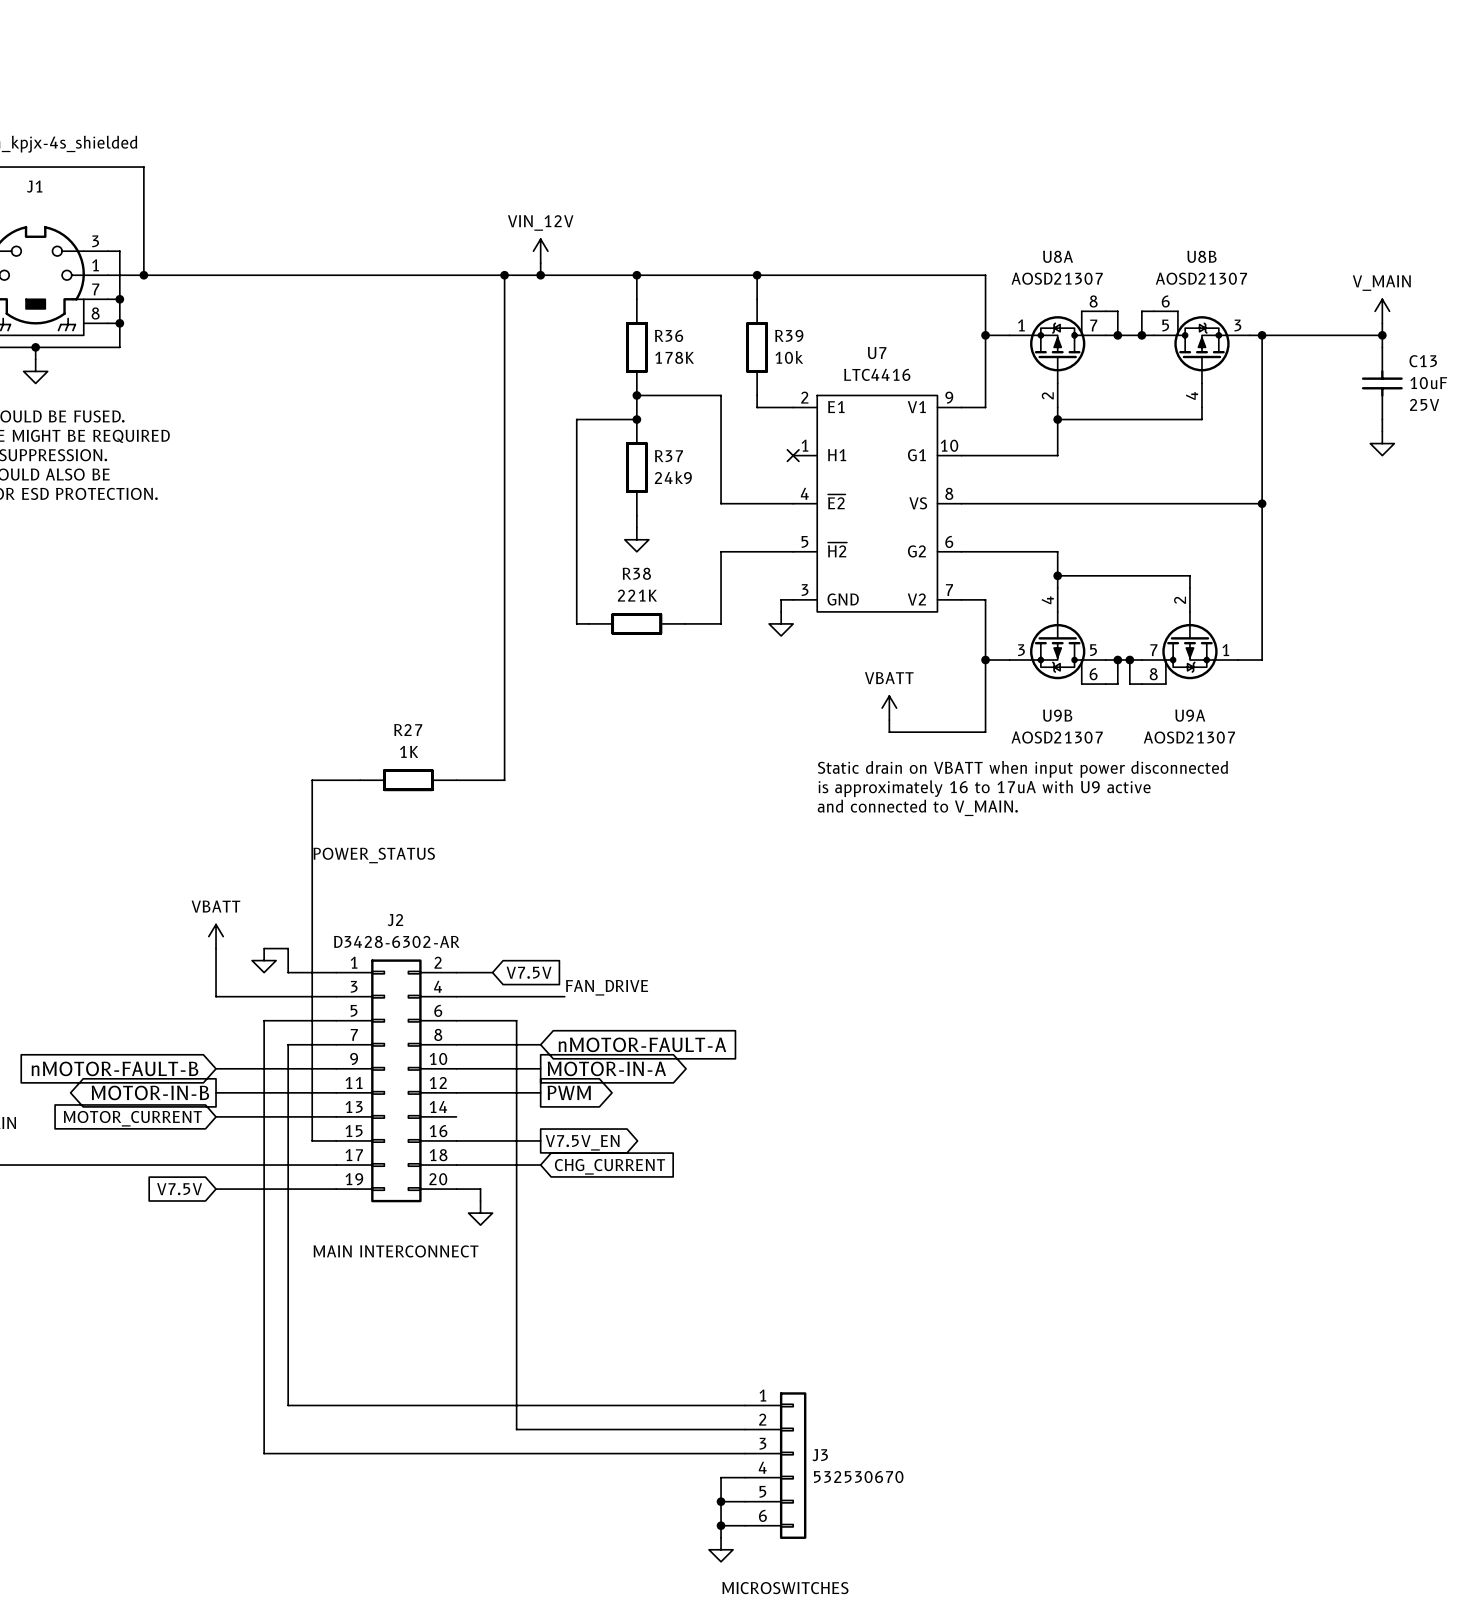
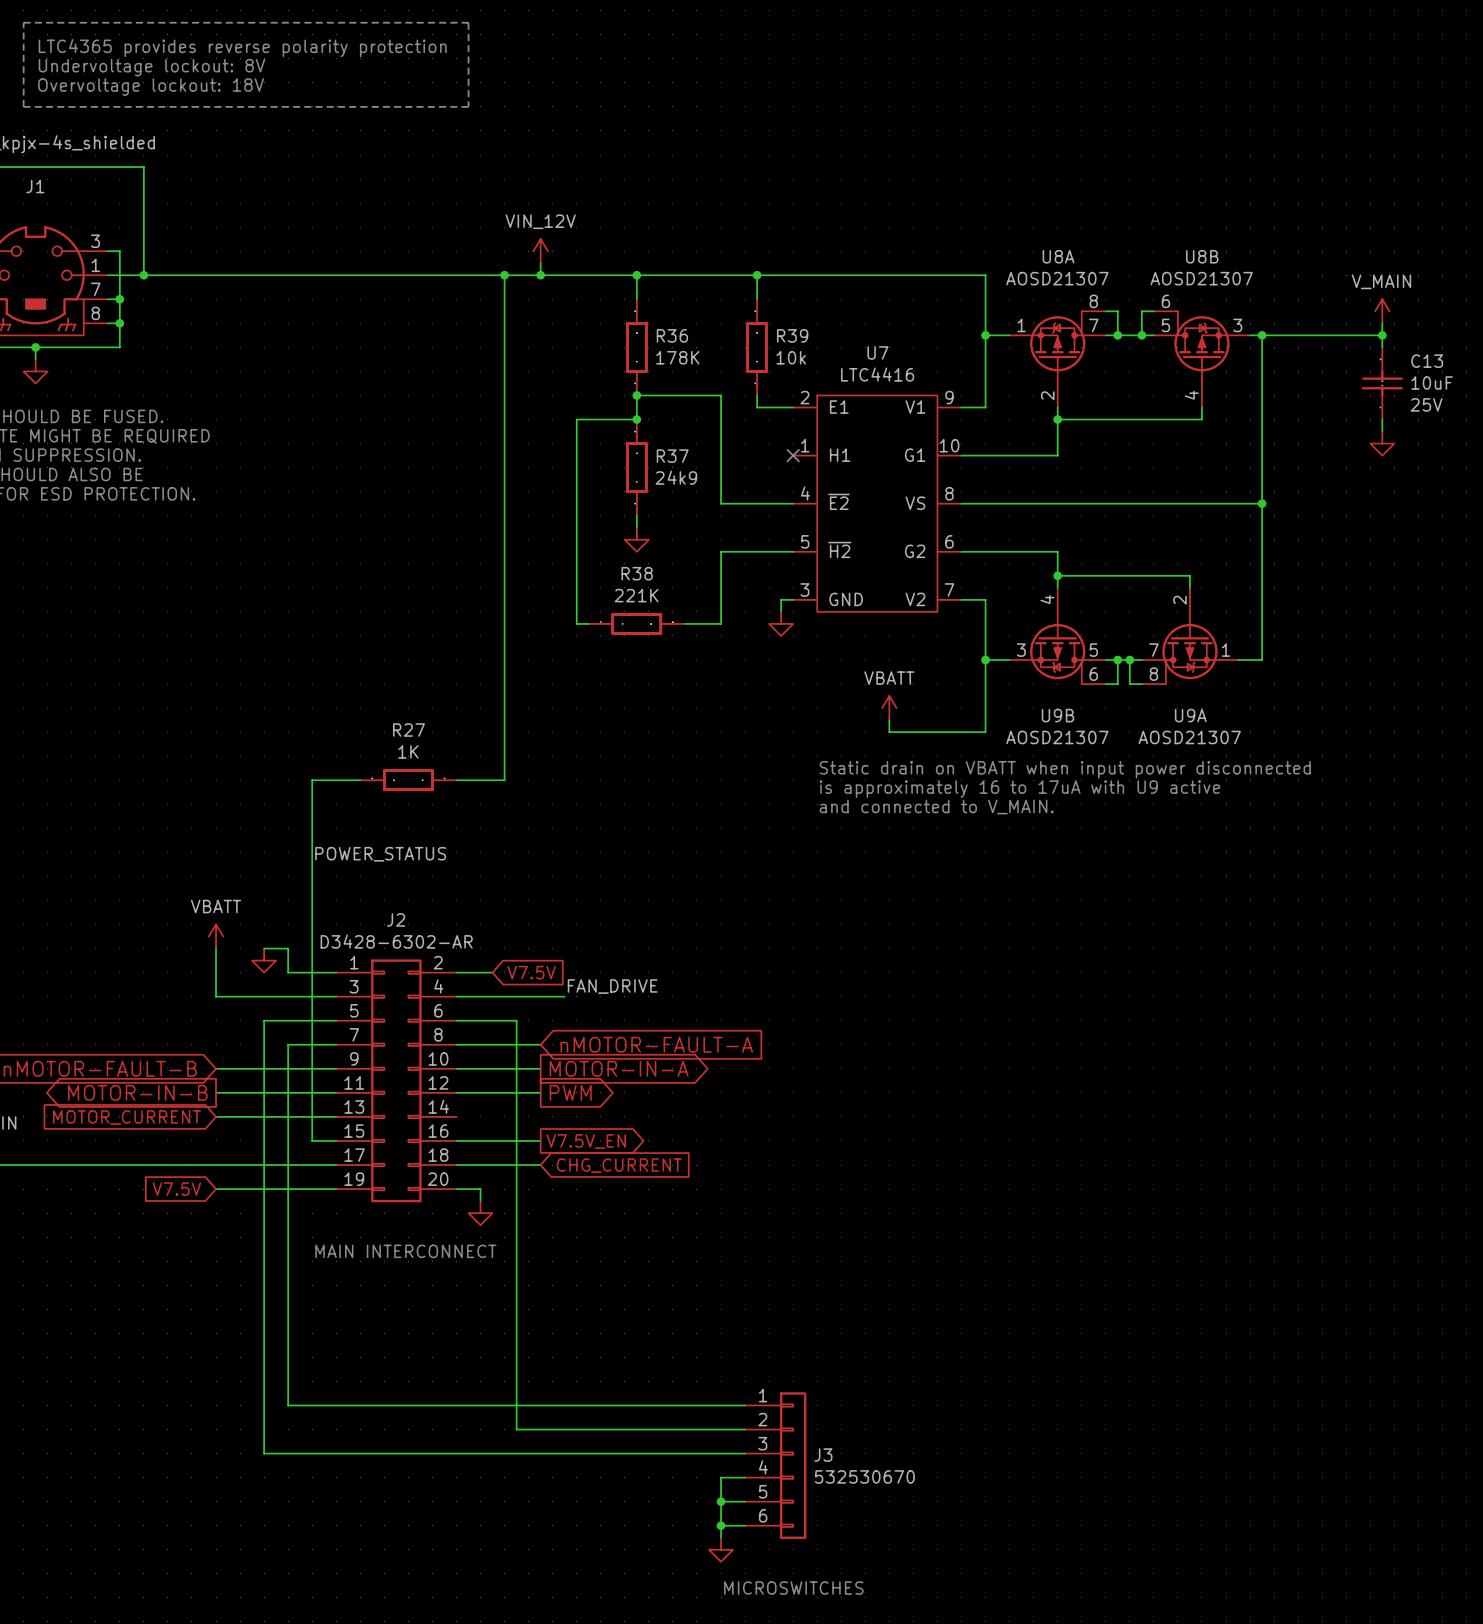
line: none -> (23, 22) (468, 22) (468, 106) (23, 106) (23, 22)
text: none -> LTC4365 provides reverse polarity protection (242, 48)
text: none -> Undervoltage lockout: 8V (151, 67)
text: none -> Overvoltage lockout: 18V (151, 87)

